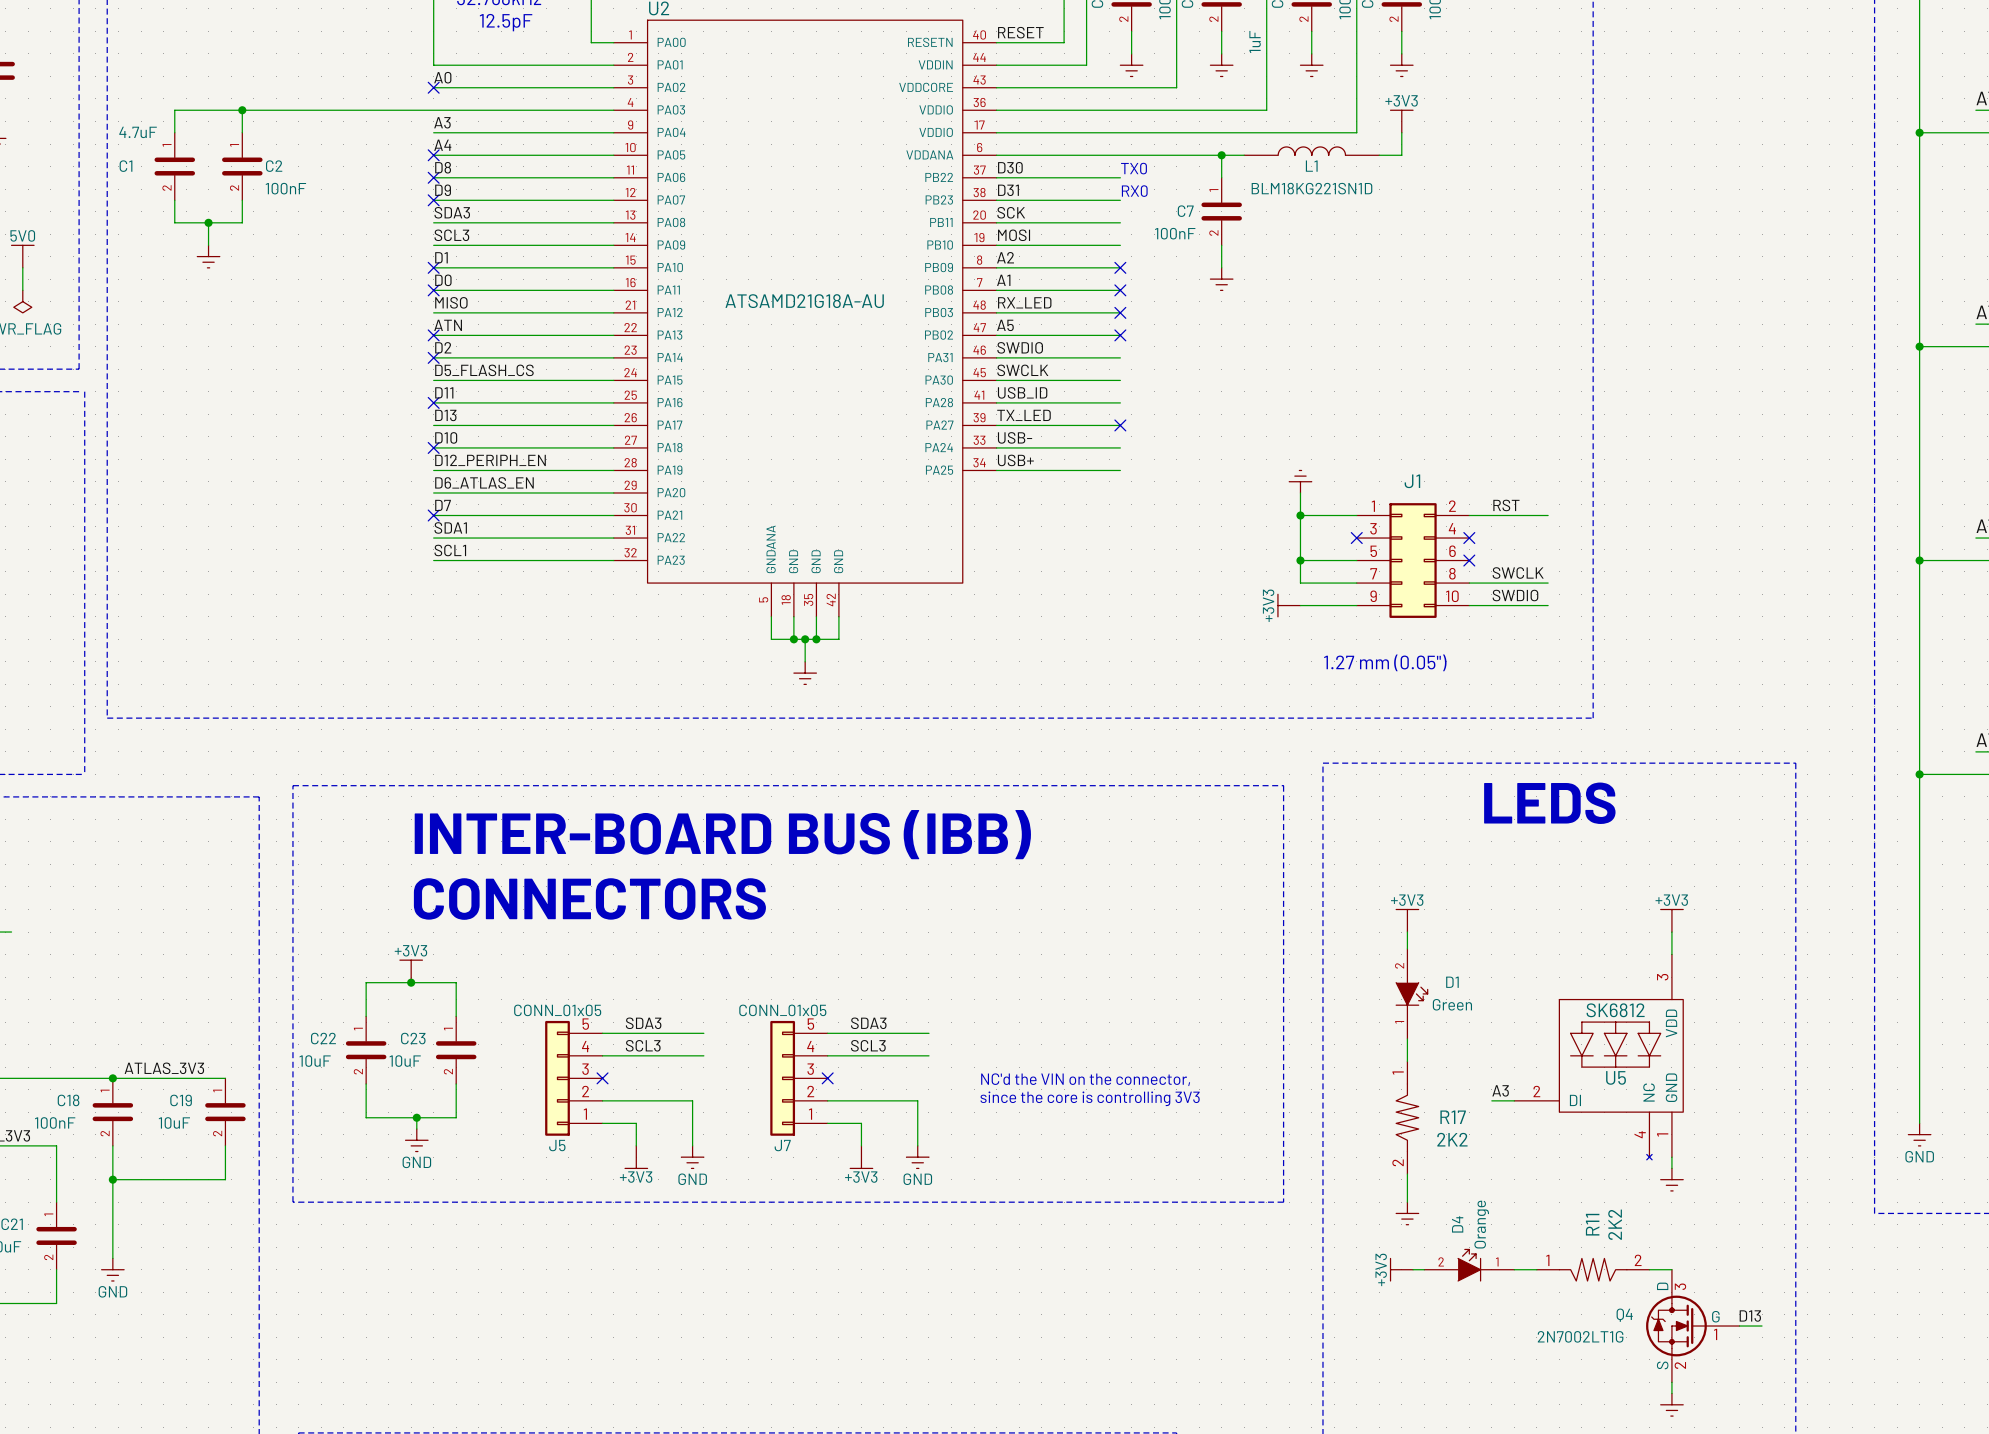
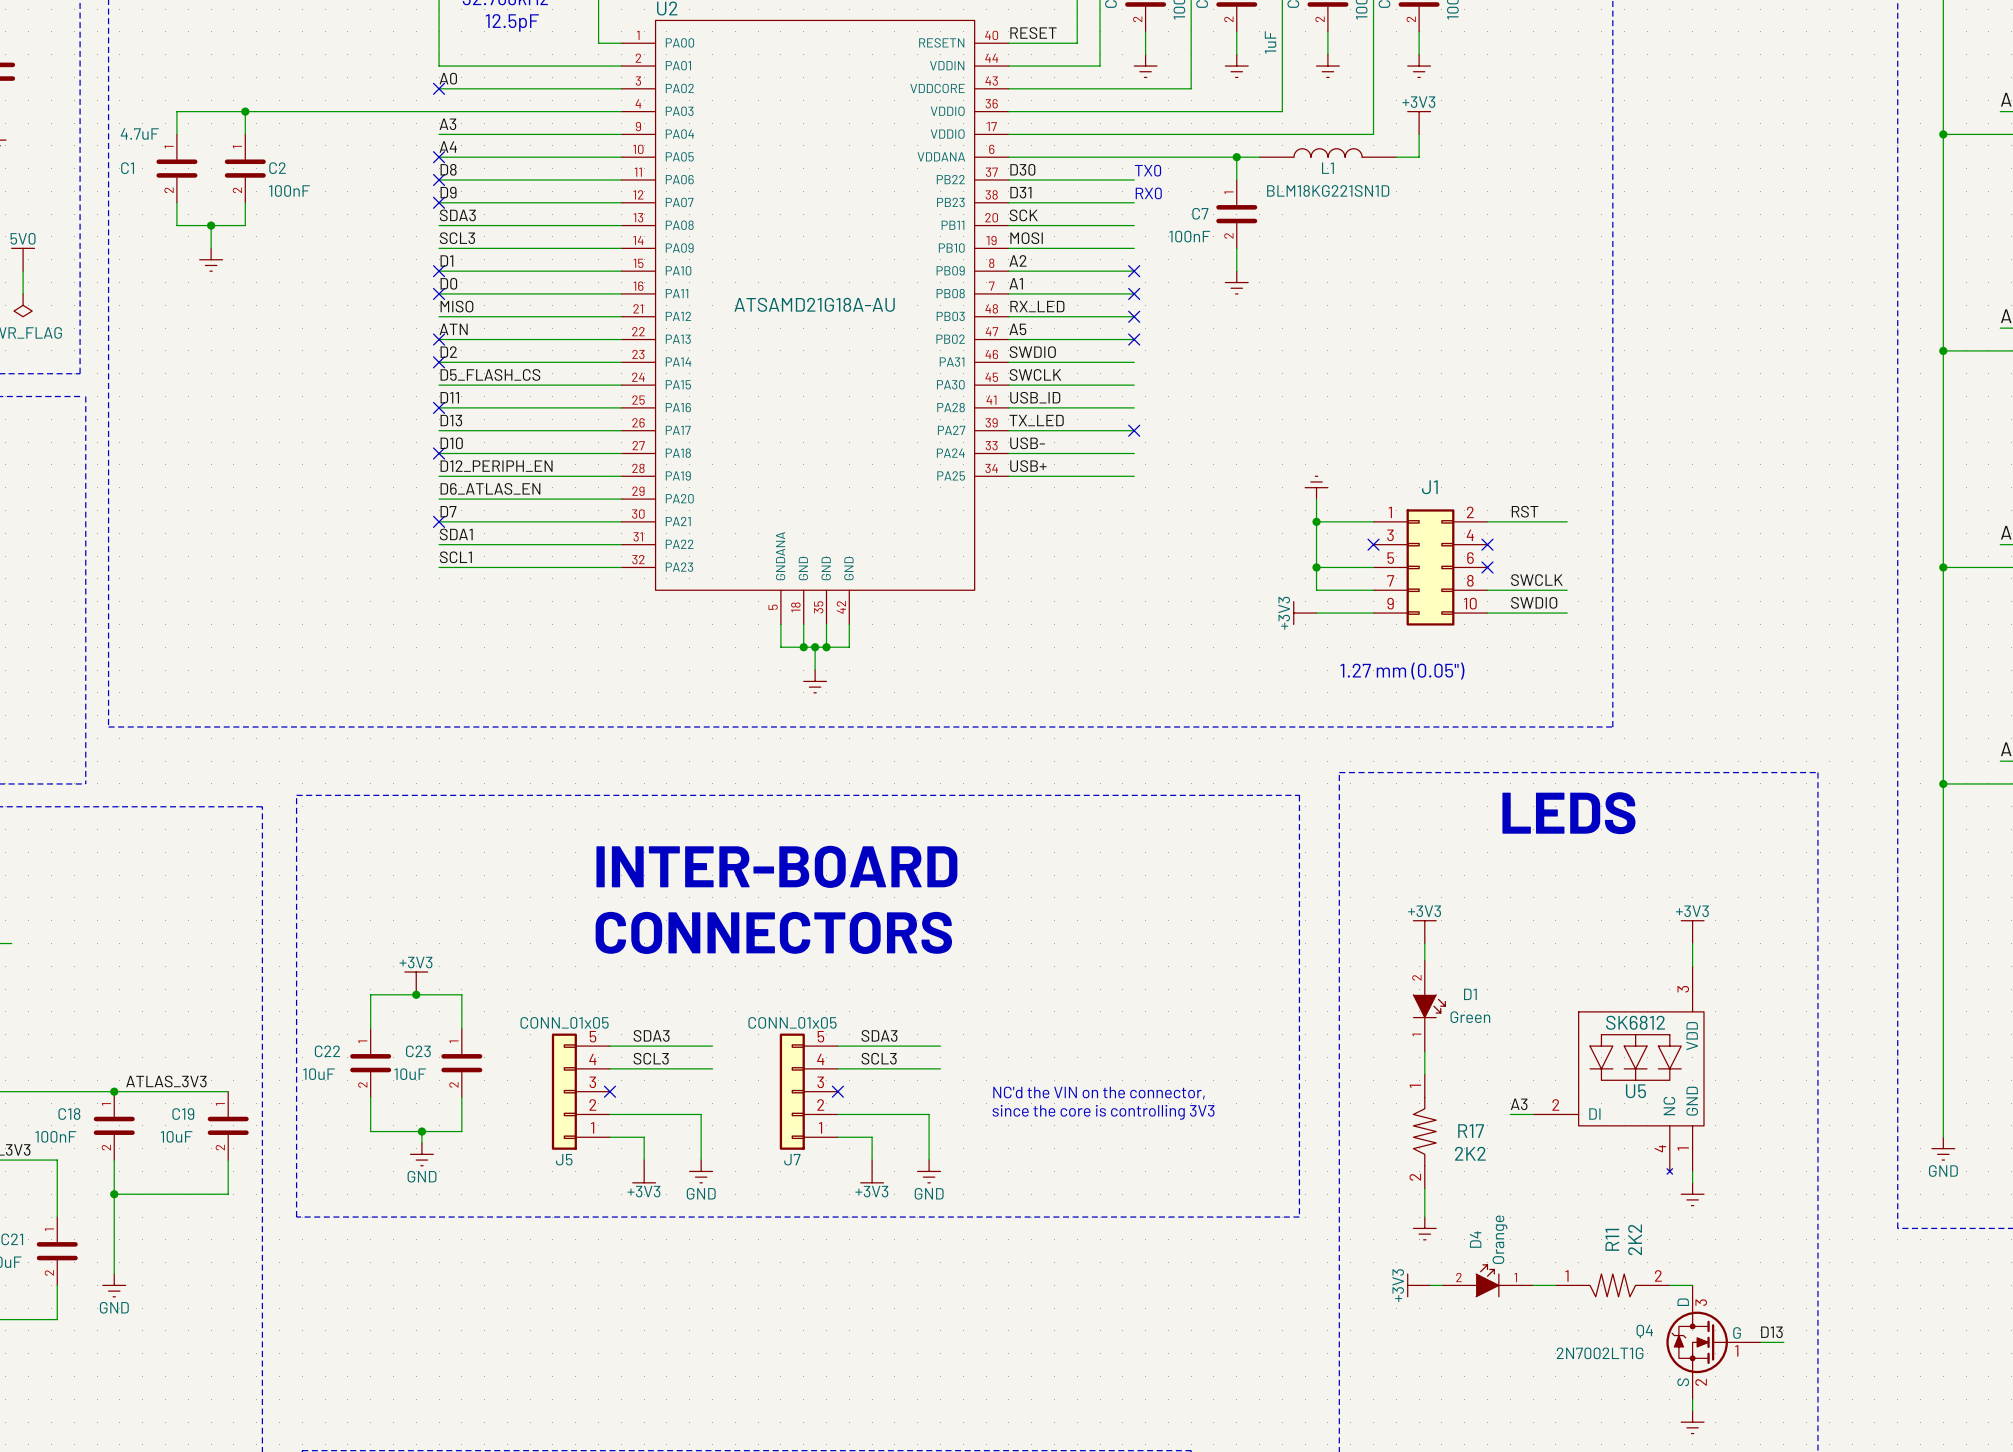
text: INTER-BOARD BUS (IBB) (722, 834) -> INTER-BOARD (776, 866)
text position: CONNECTORS (589, 899) -> CONNECTORS (773, 932)

